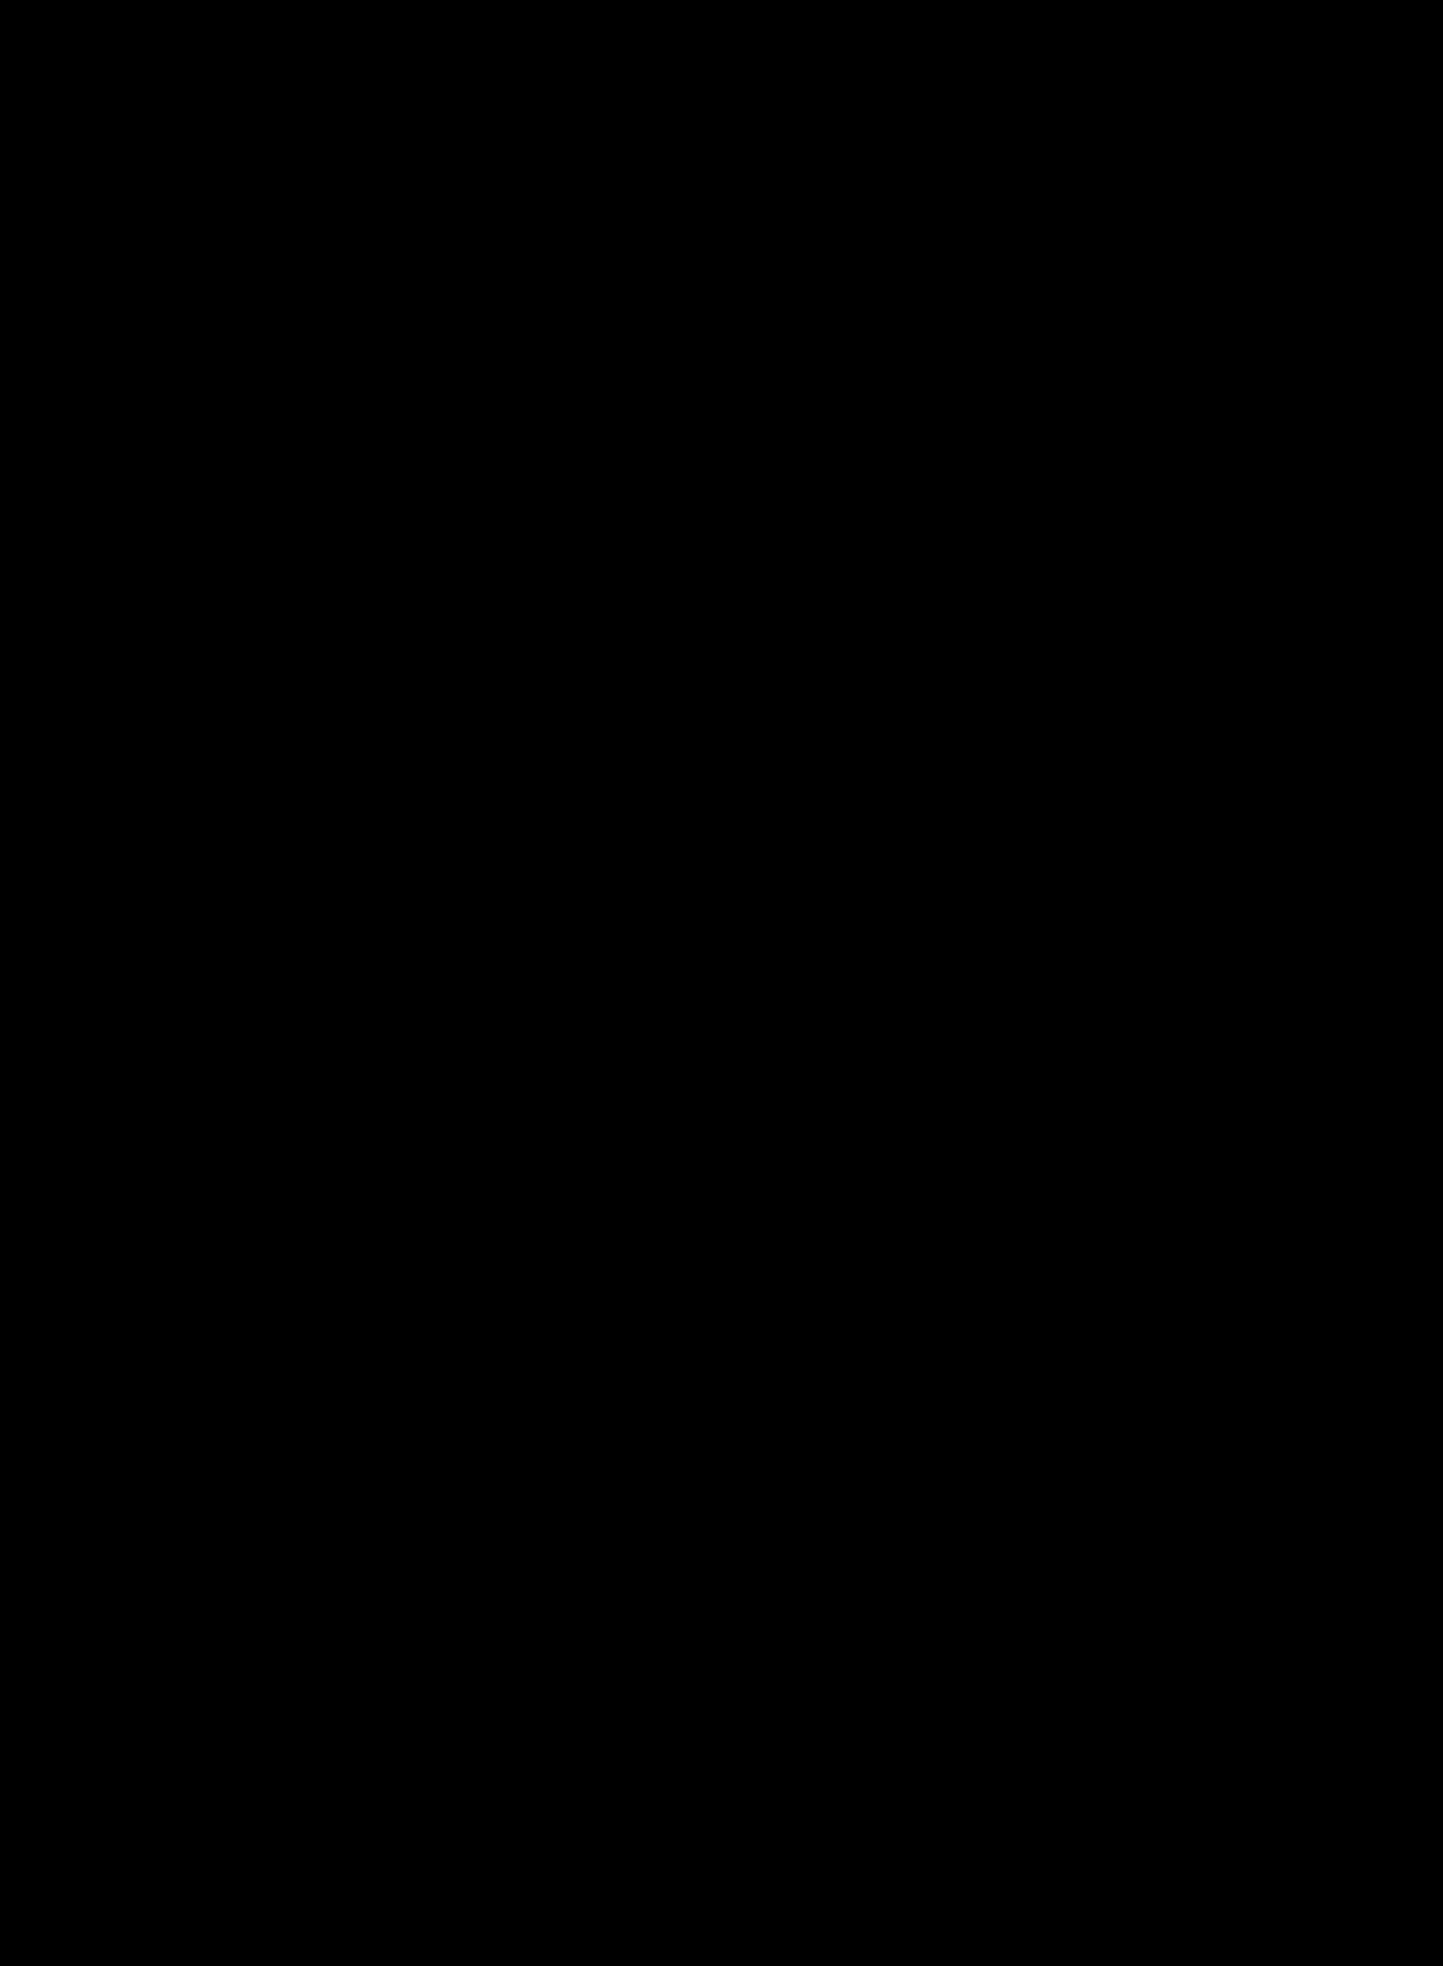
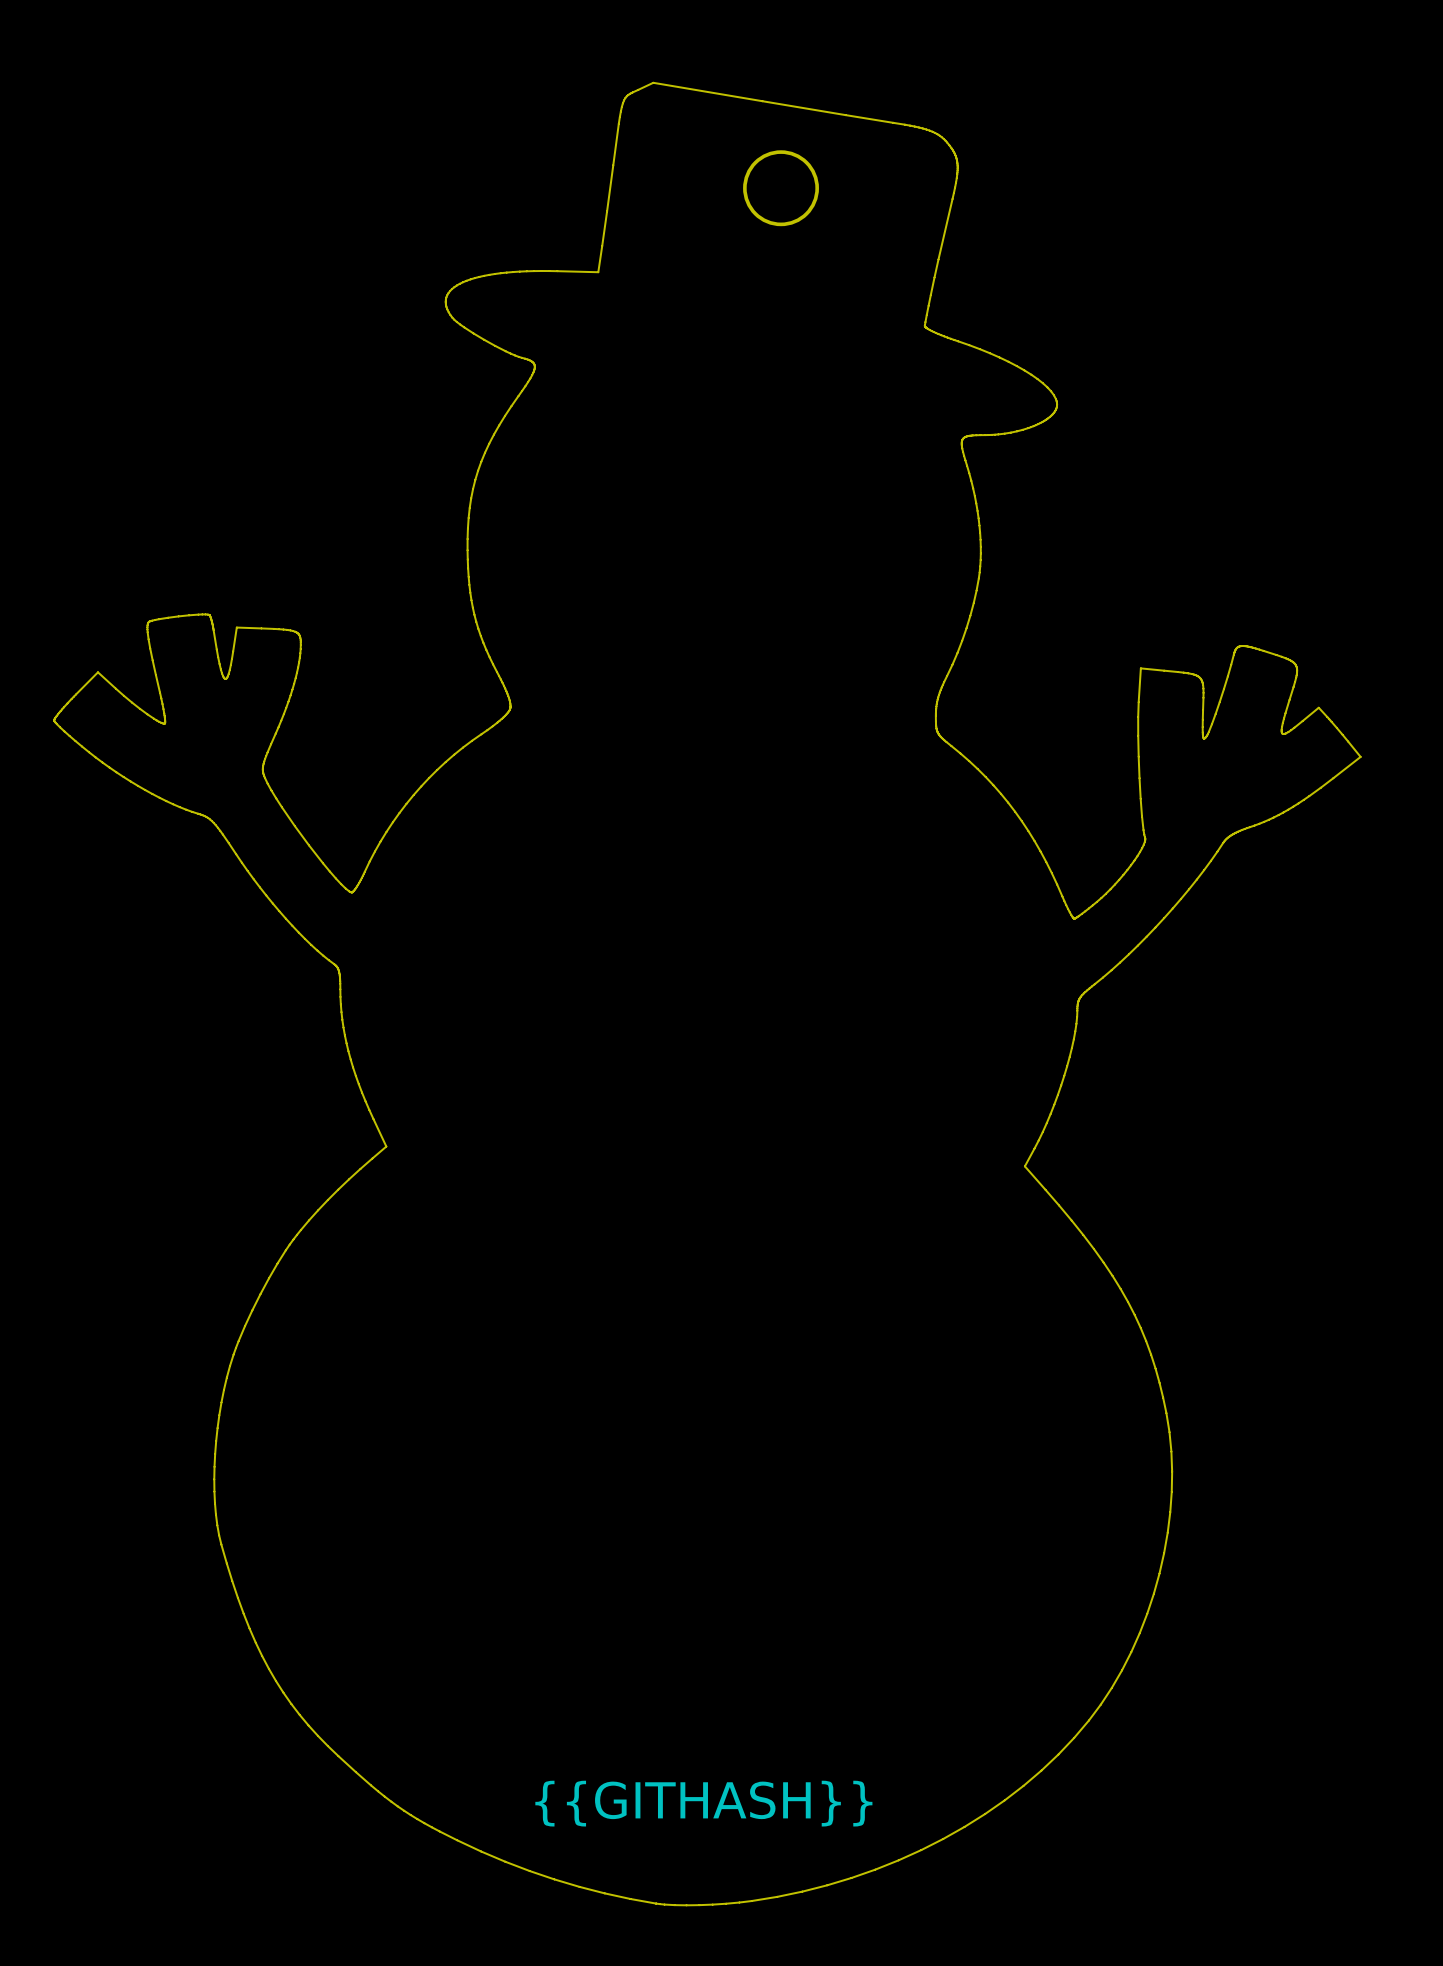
round board edge: none -> [743, 150, 819, 227]
board edge: none -> (924, 325) (957, 172) (954, 154) (941, 137) (929, 130) (910, 125) (653, 82) (626, 96) (619, 117) (598, 272) (533, 271) (489, 274) (459, 283) (450, 291) (446, 297) (447, 309) (456, 321) (495, 345) (531, 361) (534, 365) (530, 378) (499, 425) (485, 452) (475, 479) (468, 517) (468, 568) (472, 607) (480, 635) (506, 691) (510, 707) (499, 720) (445, 762) (413, 795) (386, 831) (352, 892)
board edge: none -> (925, 326) (935, 332) (990, 353) (1016, 366) (1042, 383) (1051, 391) (1056, 401) (1056, 407) (1052, 414) (1033, 426) (1004, 433) (968, 436) (962, 440) (962, 448) (973, 488) (978, 518) (980, 566) (976, 590) (966, 628) (938, 697) (935, 721) (937, 730) (940, 736) (985, 776) (1021, 821) (1046, 862) (1073, 918)
board edge: none -> (209, 614) (178, 616) (148, 622) (148, 639) (165, 723)
board edge: none -> (209, 615) (220, 669) (225, 679) (229, 670) (236, 627) (287, 629) (295, 631) (299, 635) (300, 653) (295, 678) (286, 707) (265, 758) (263, 772) (276, 798) (309, 845) (335, 878) (351, 892)
board edge: none -> (54, 719) (97, 672) (140, 708) (164, 723)
board edge: none -> (54, 720) (82, 746) (123, 777) (166, 801) (210, 819) (279, 911) (311, 945) (336, 966) (339, 976) (343, 1027) (350, 1059) (365, 1101) (386, 1146) (327, 1200) (285, 1250) (268, 1278) (244, 1326) (233, 1354) (223, 1389) (217, 1428) (214, 1466) (217, 1525) (237, 1597) (255, 1642) (268, 1668) (291, 1704) (327, 1746) (384, 1796) (424, 1823) (481, 1851) (554, 1879) (630, 1898) (660, 1904) (686, 1905) (751, 1901) (827, 1885) (898, 1860) (964, 1826) (1023, 1785) (1074, 1737) (1111, 1687) (1139, 1633) (1159, 1573) (1170, 1512) (1171, 1451) (1166, 1413) (1159, 1382) (1140, 1328) (1112, 1275) (1071, 1220) (1024, 1166) (1046, 1123) (1061, 1085) (1071, 1047) (1077, 1003) (1081, 996) (1128, 954) (1164, 918) (1196, 879) (1227, 838) (1293, 806) (1360, 756) (1318, 707) (1291, 730) (1282, 733) (1282, 723) (1296, 675) (1296, 666) (1286, 658) (1245, 646) (1238, 646) (1235, 650) (1215, 713) (1204, 738)
board edge: none -> (1203, 738) (1203, 688) (1199, 677) (1188, 673) (1140, 668) (1138, 756) (1144, 841) (1134, 860) (1114, 884) (1096, 901) (1074, 918)
text: none -> {{GITHASH}} (703, 1803)

